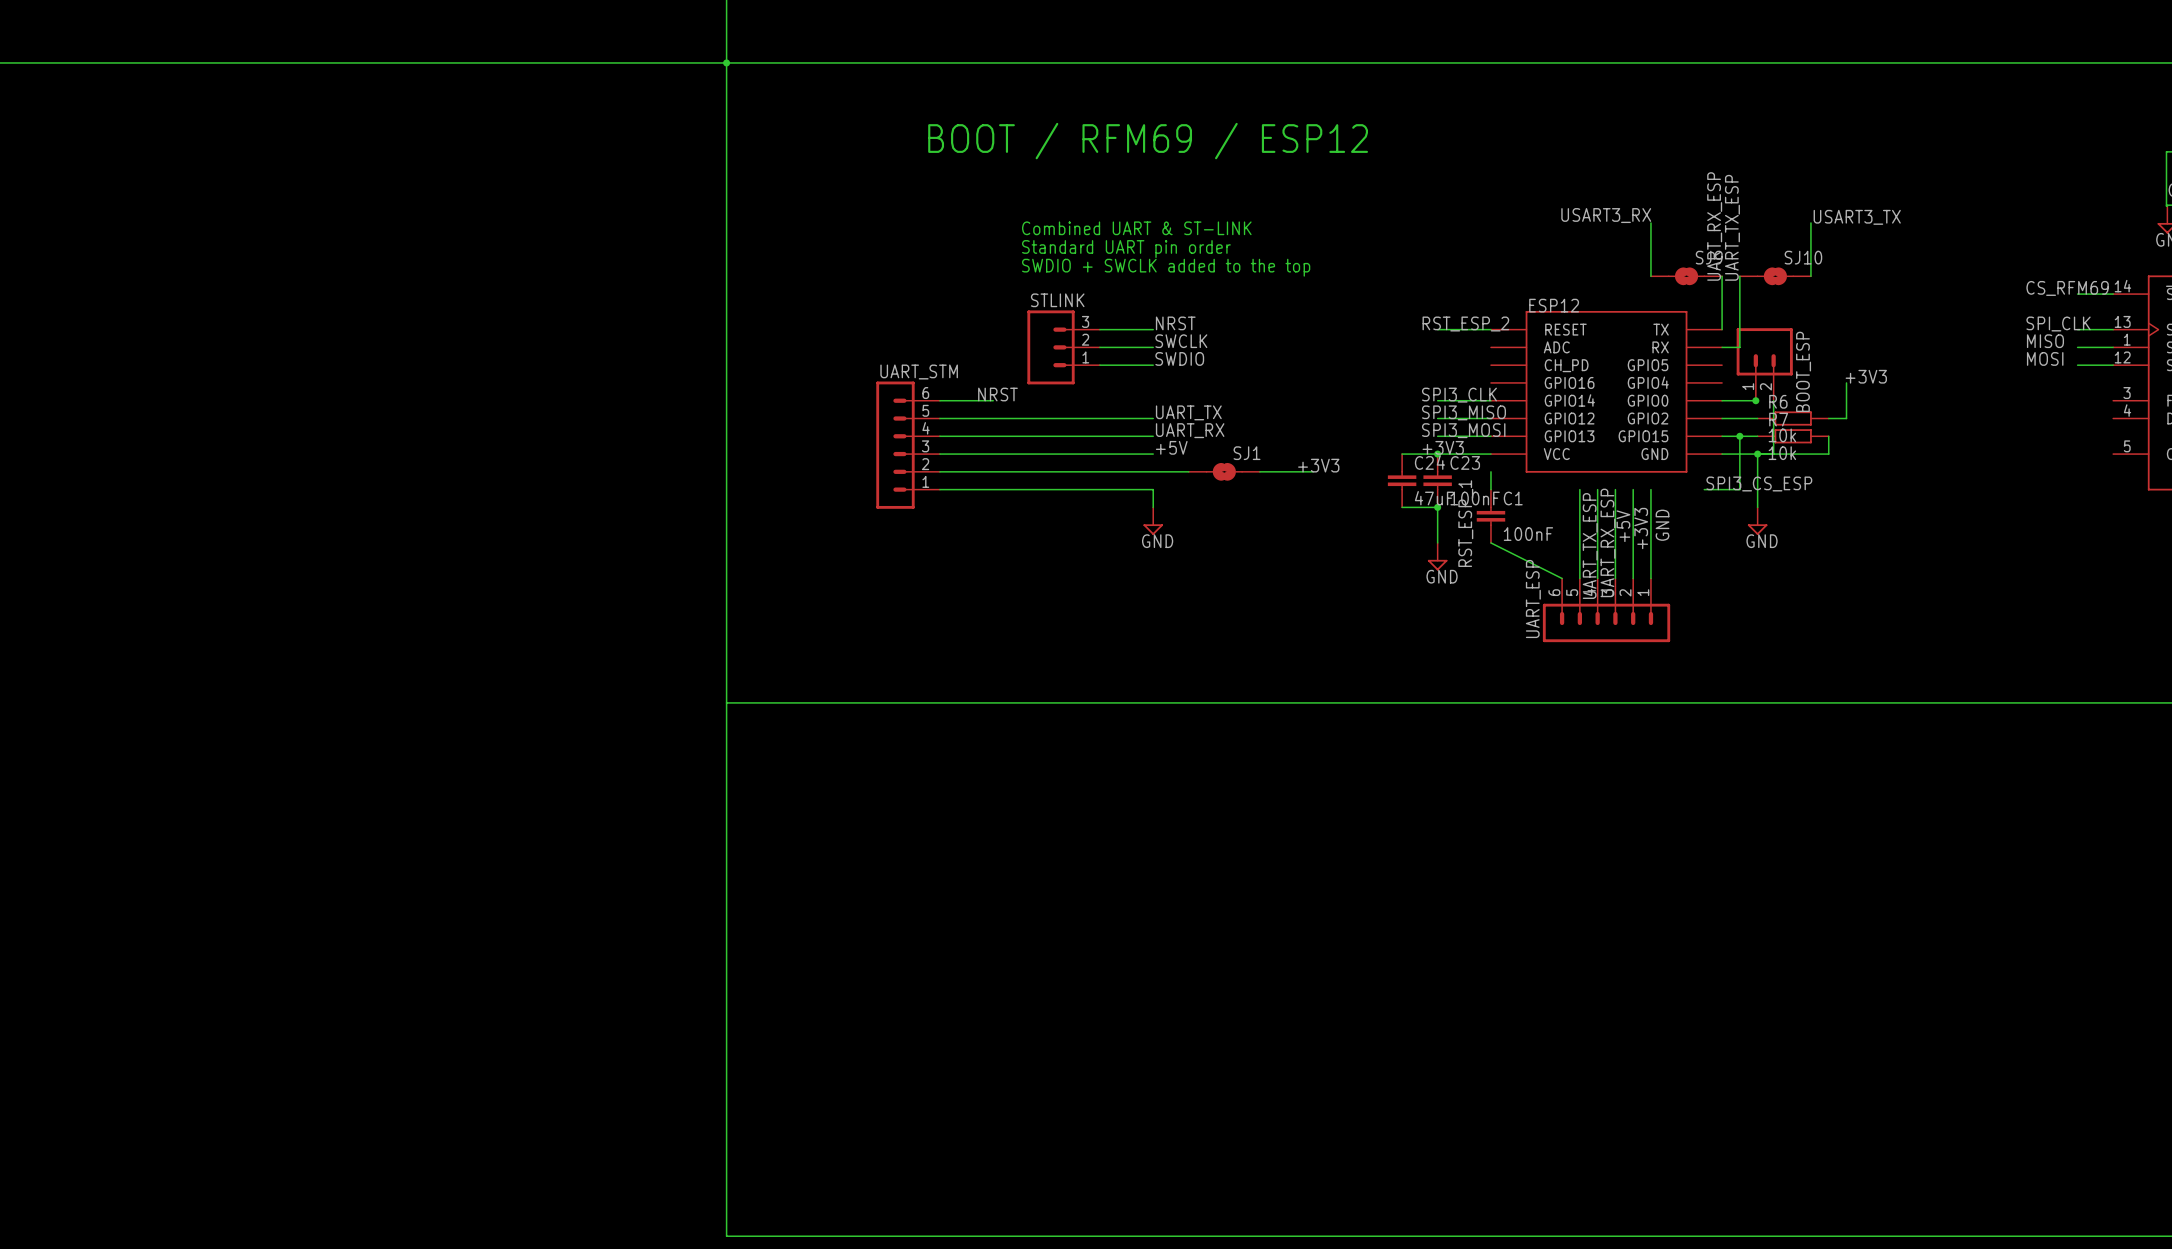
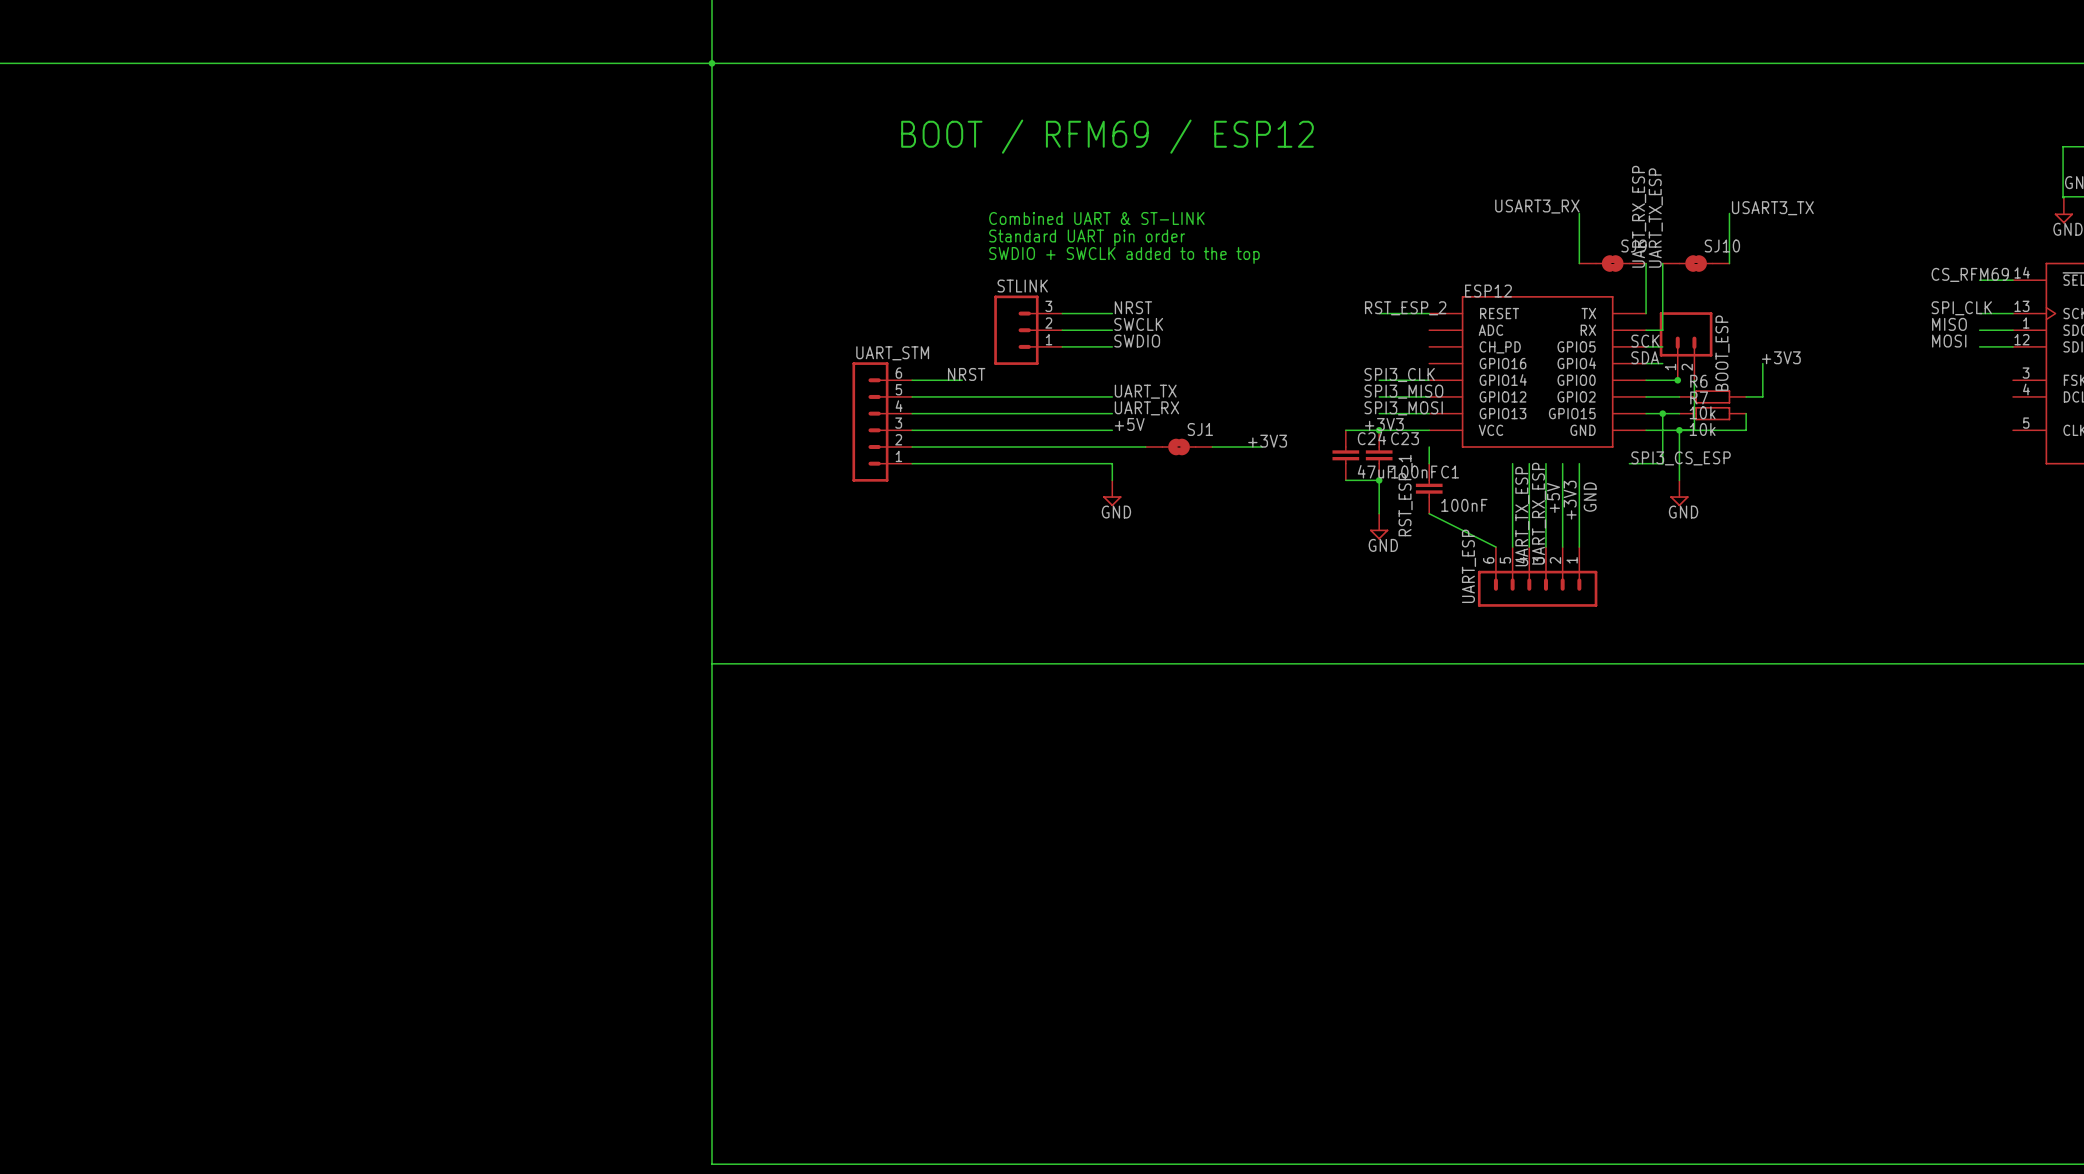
label: none -> SCK (1645, 341)
wire: none -> (1646, 346) (1662, 346)
label: none -> SDA (1645, 357)
wire: none -> (1646, 363) (1662, 363)

